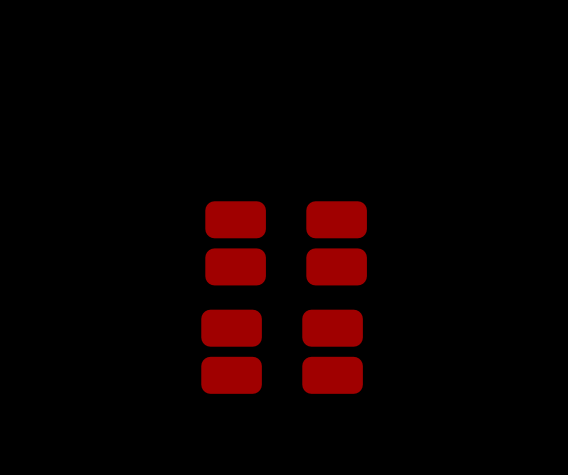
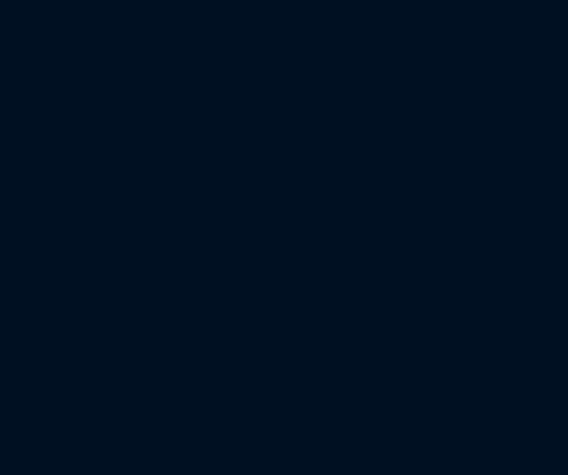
part: (286, 243) -> none
part: (282, 351) -> none

